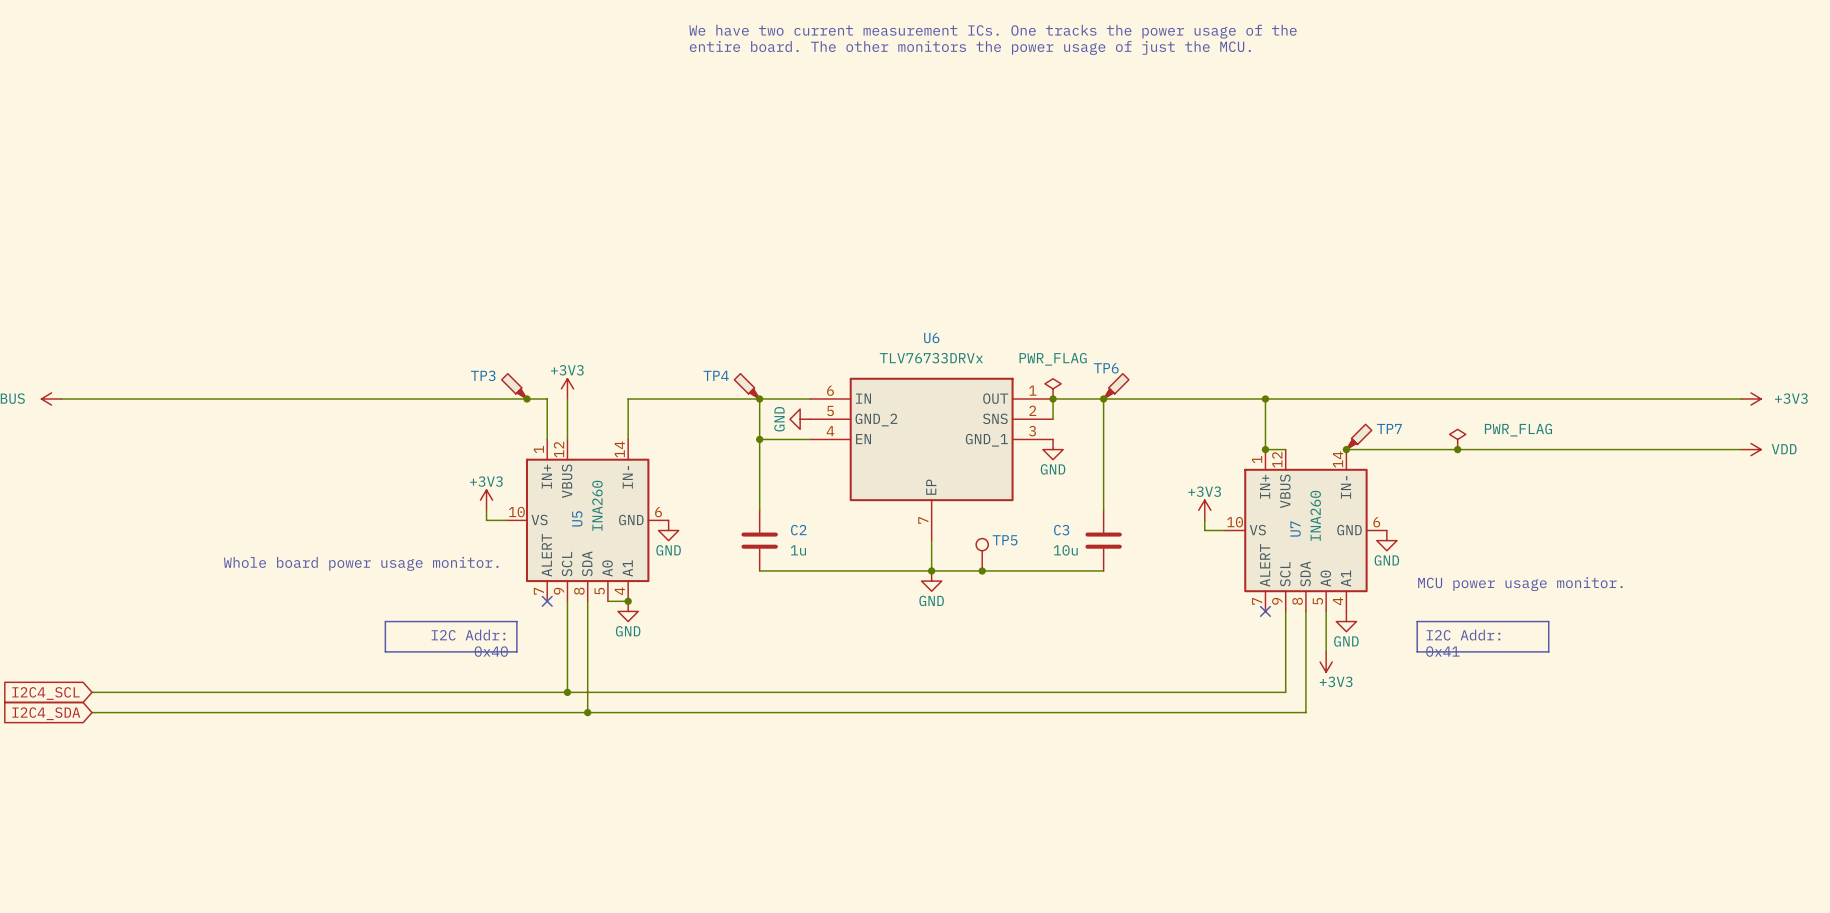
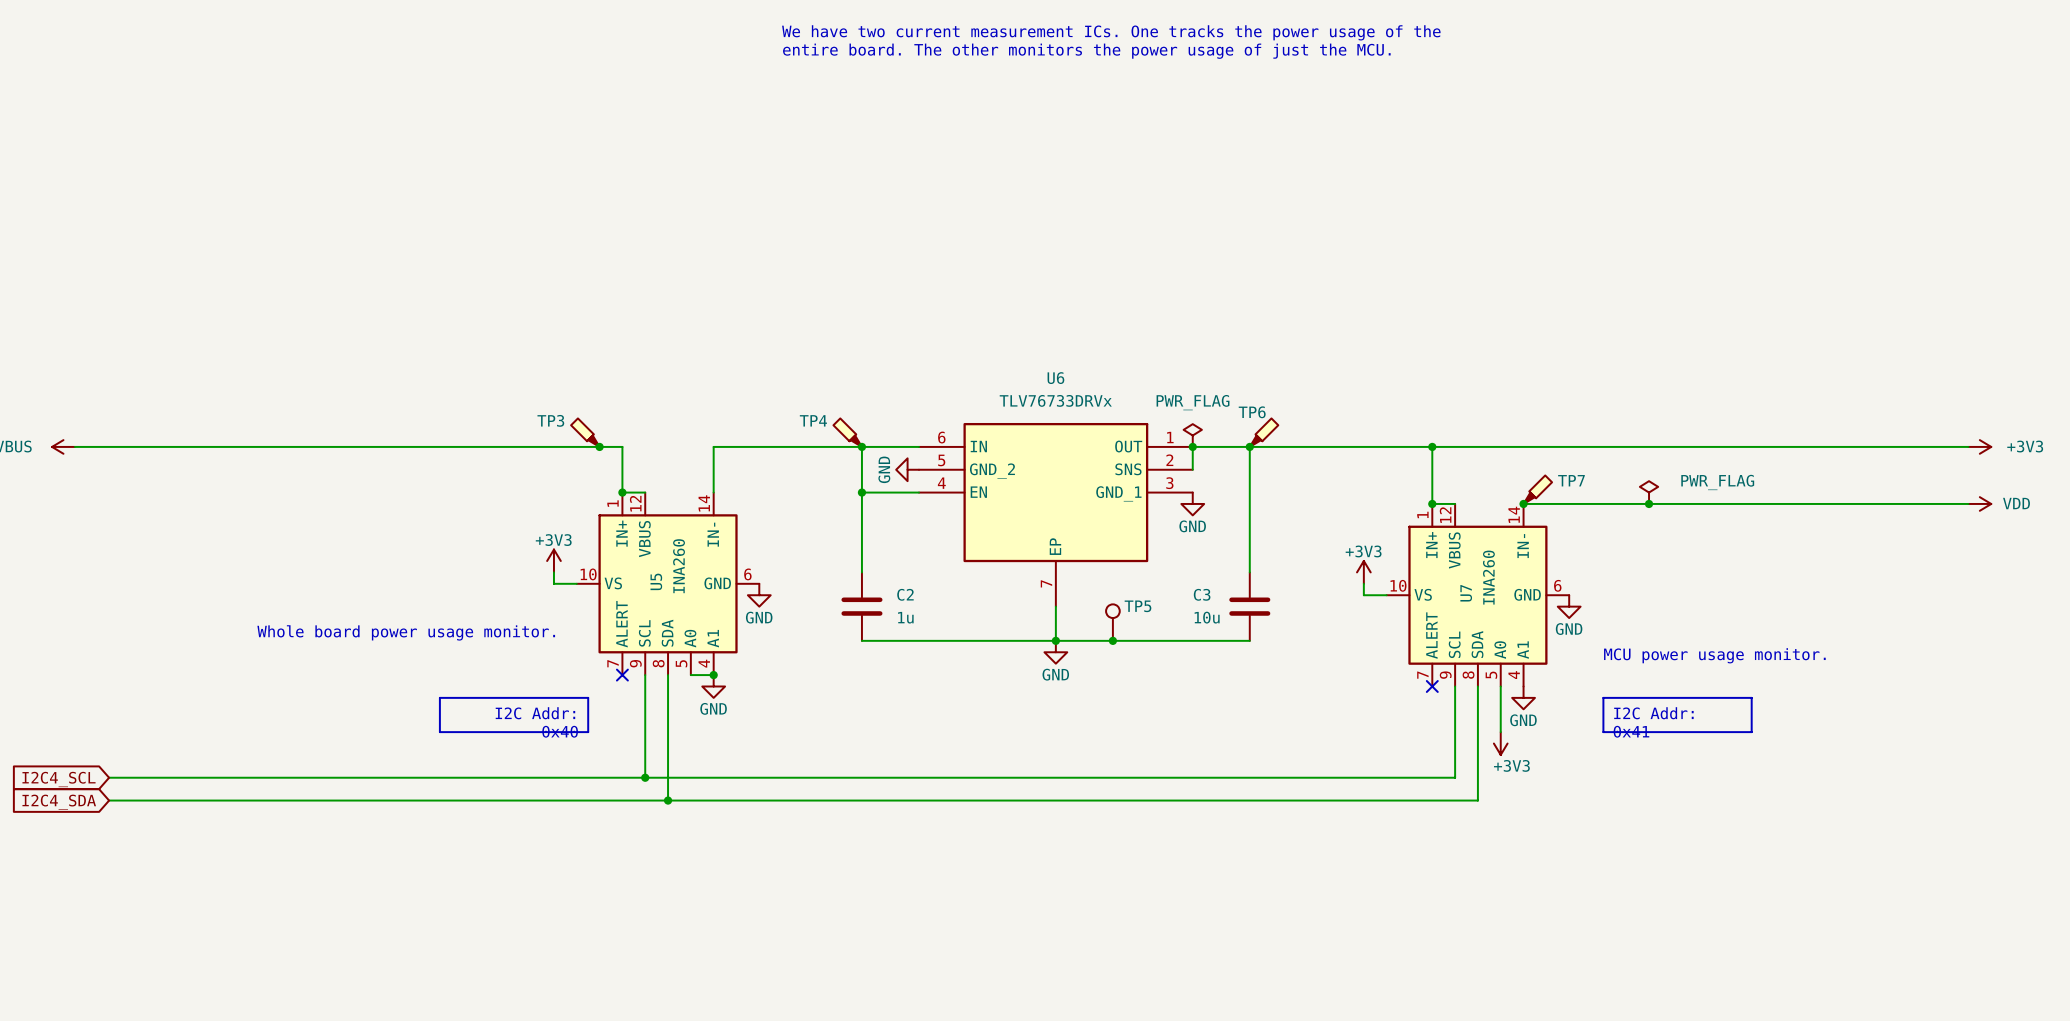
power symbol: +3V3 (567, 388) -> none
wire: (567, 399) (567, 439) -> (622, 492) (645, 492)
junction: none -> (622, 492)

